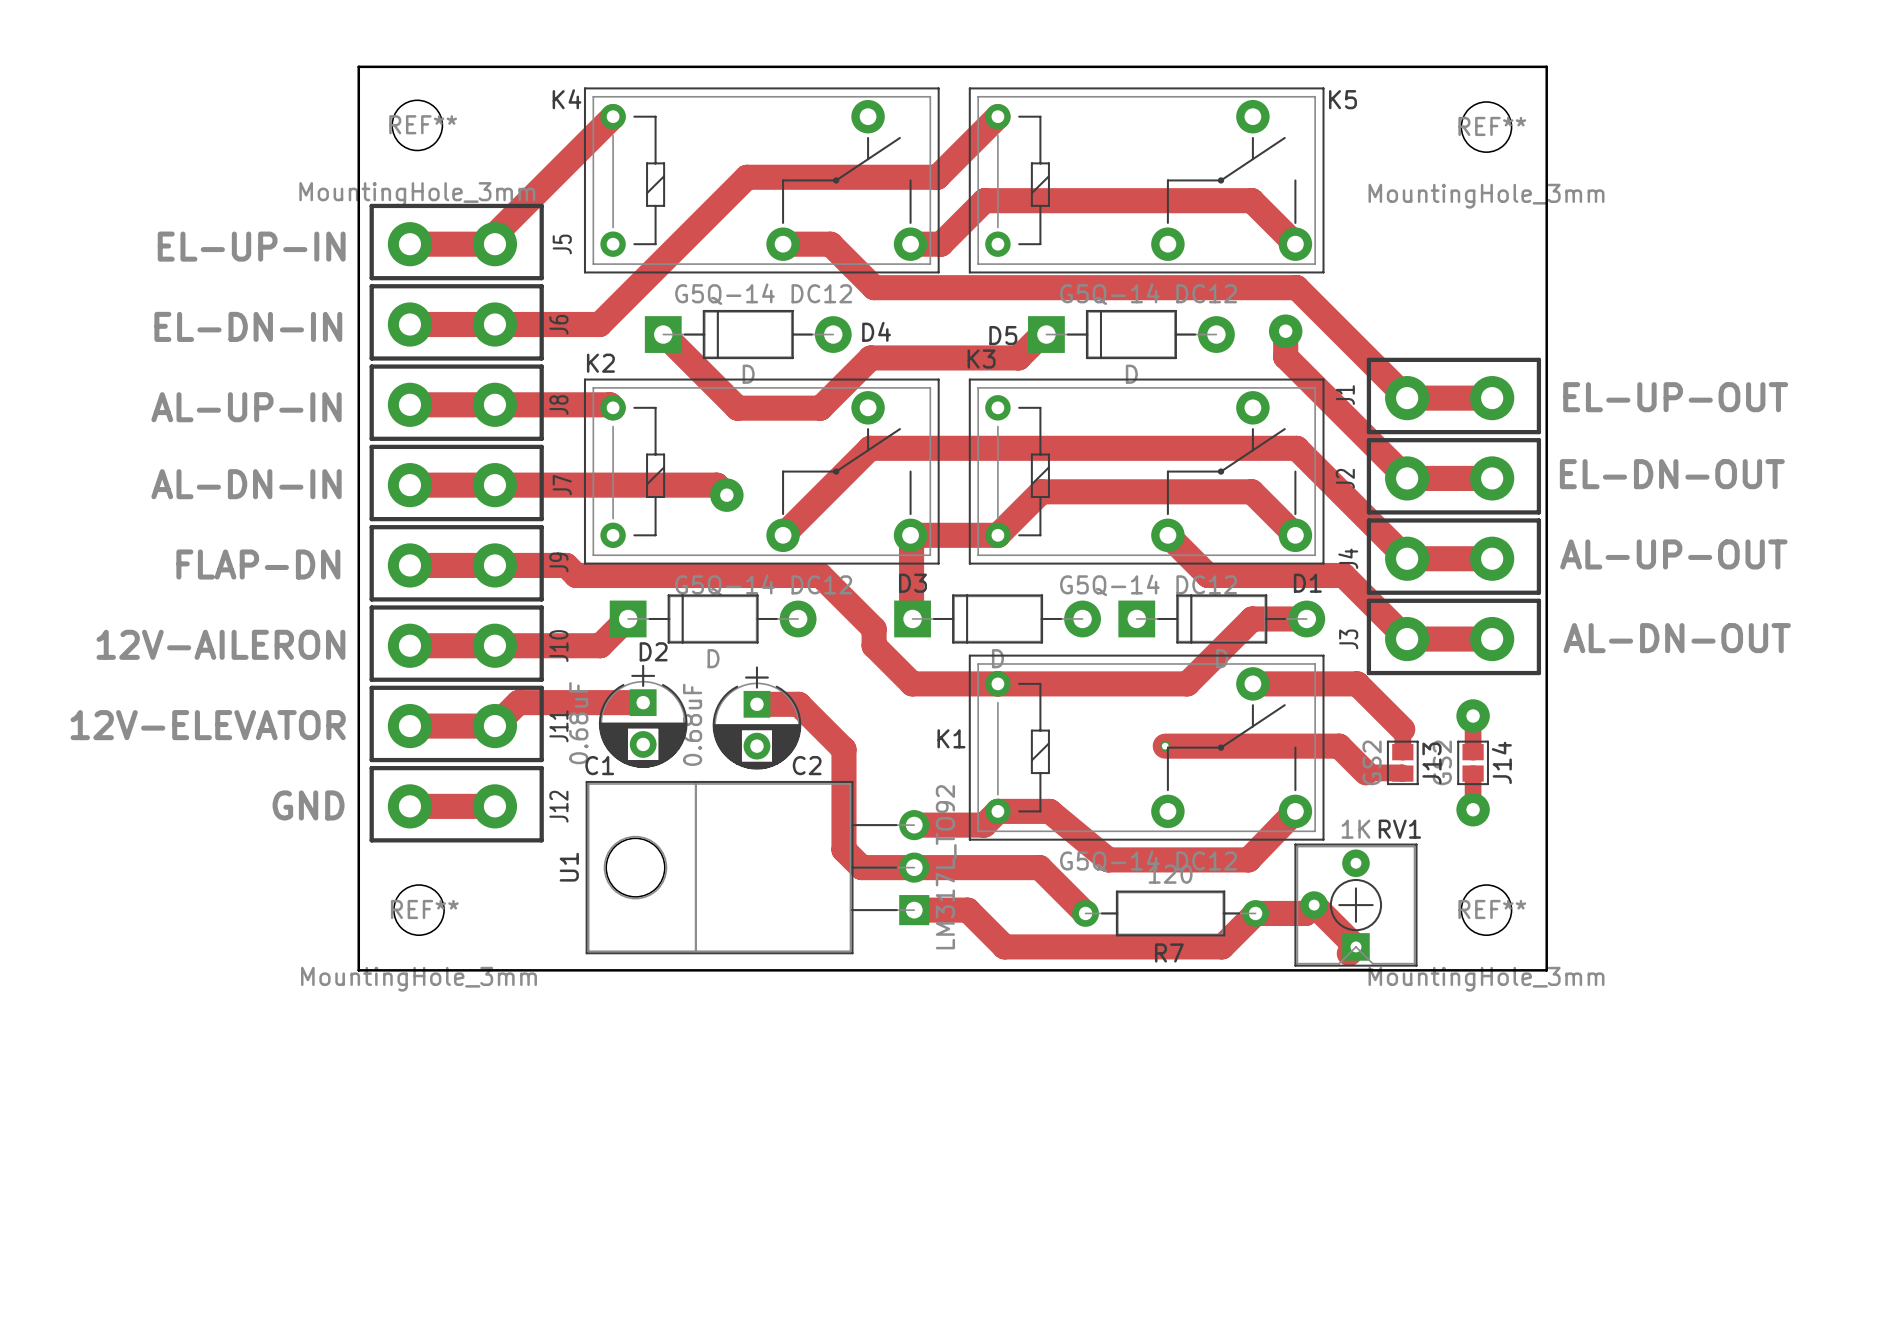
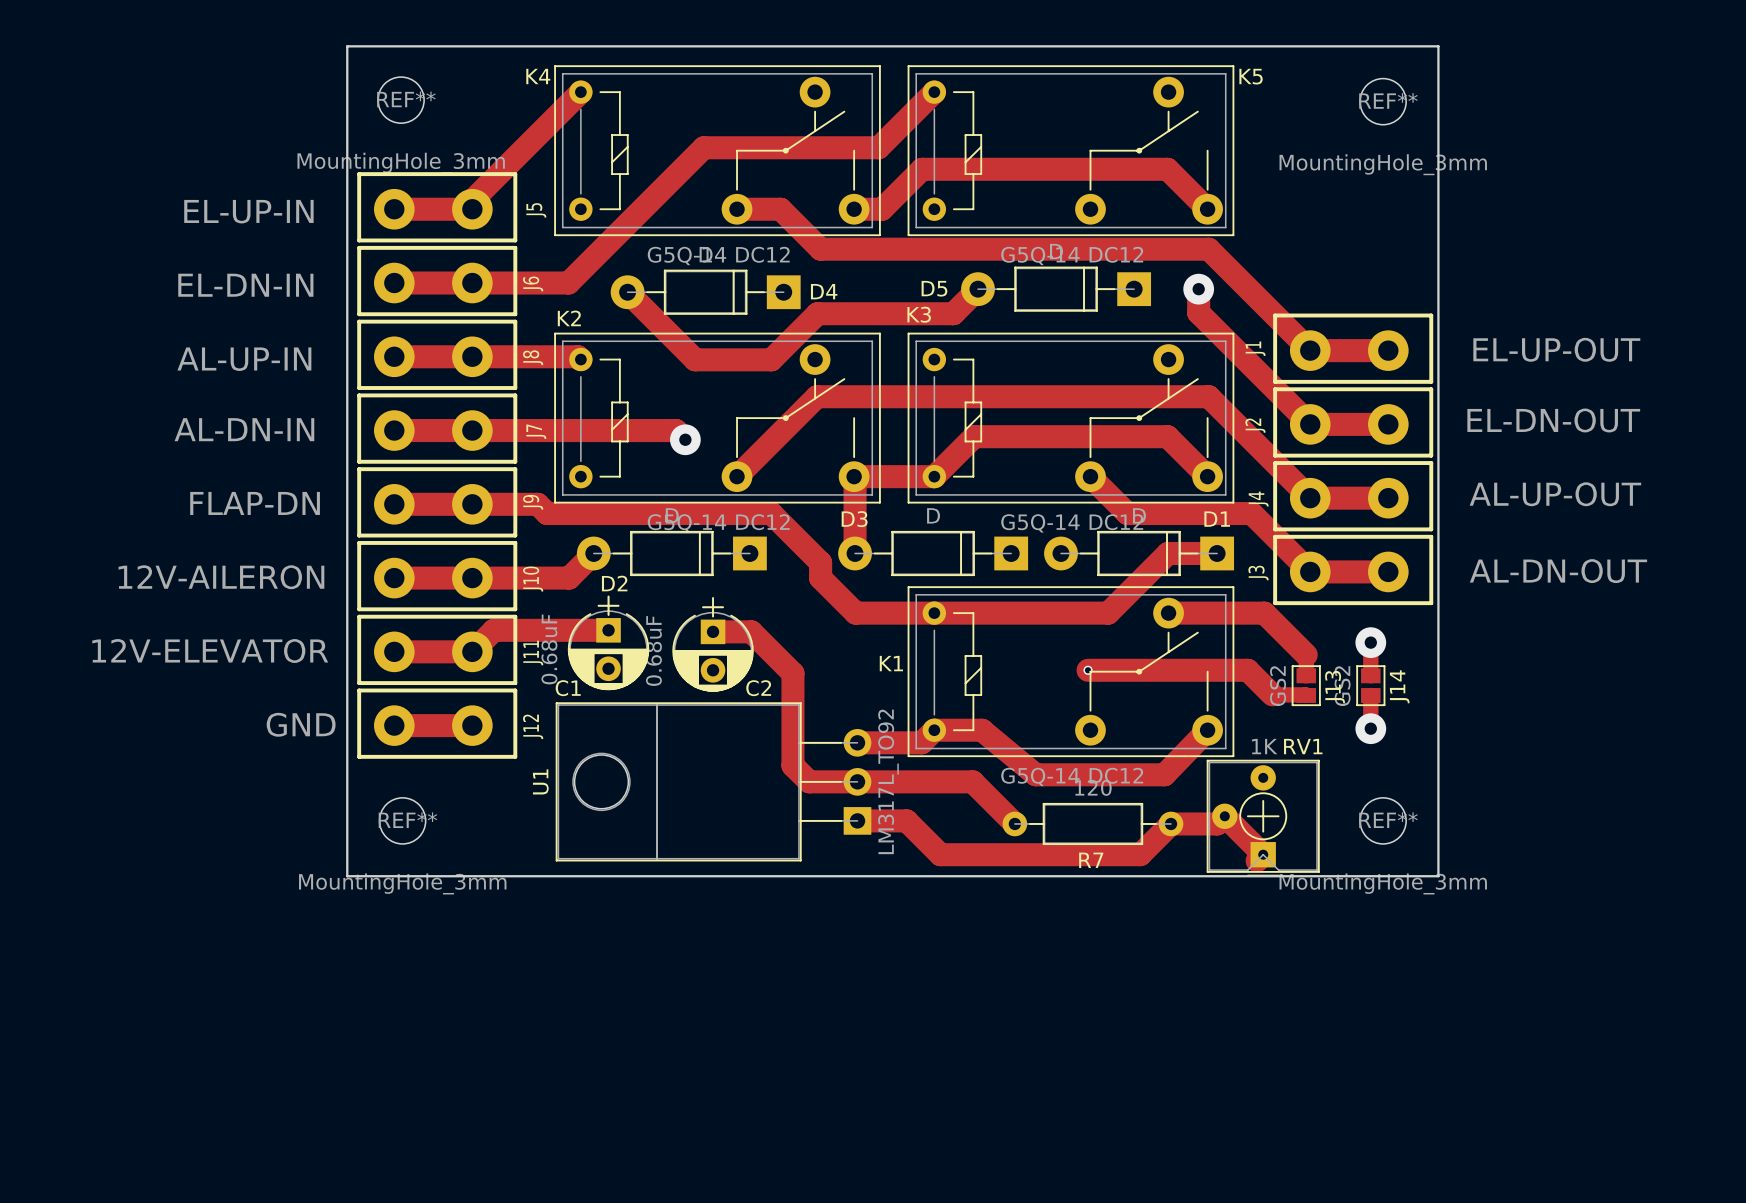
D4 rotation: 0° (748, 334) -> 180° (705, 292)
D5 rotation: 0° (1131, 334) -> 180° (1056, 289)
D2 rotation: 0° (713, 618) -> 180° (671, 553)
D3 rotation: 0° (997, 618) -> 180° (933, 553)
D1 rotation: 0° (1221, 618) -> 180° (1139, 553)

